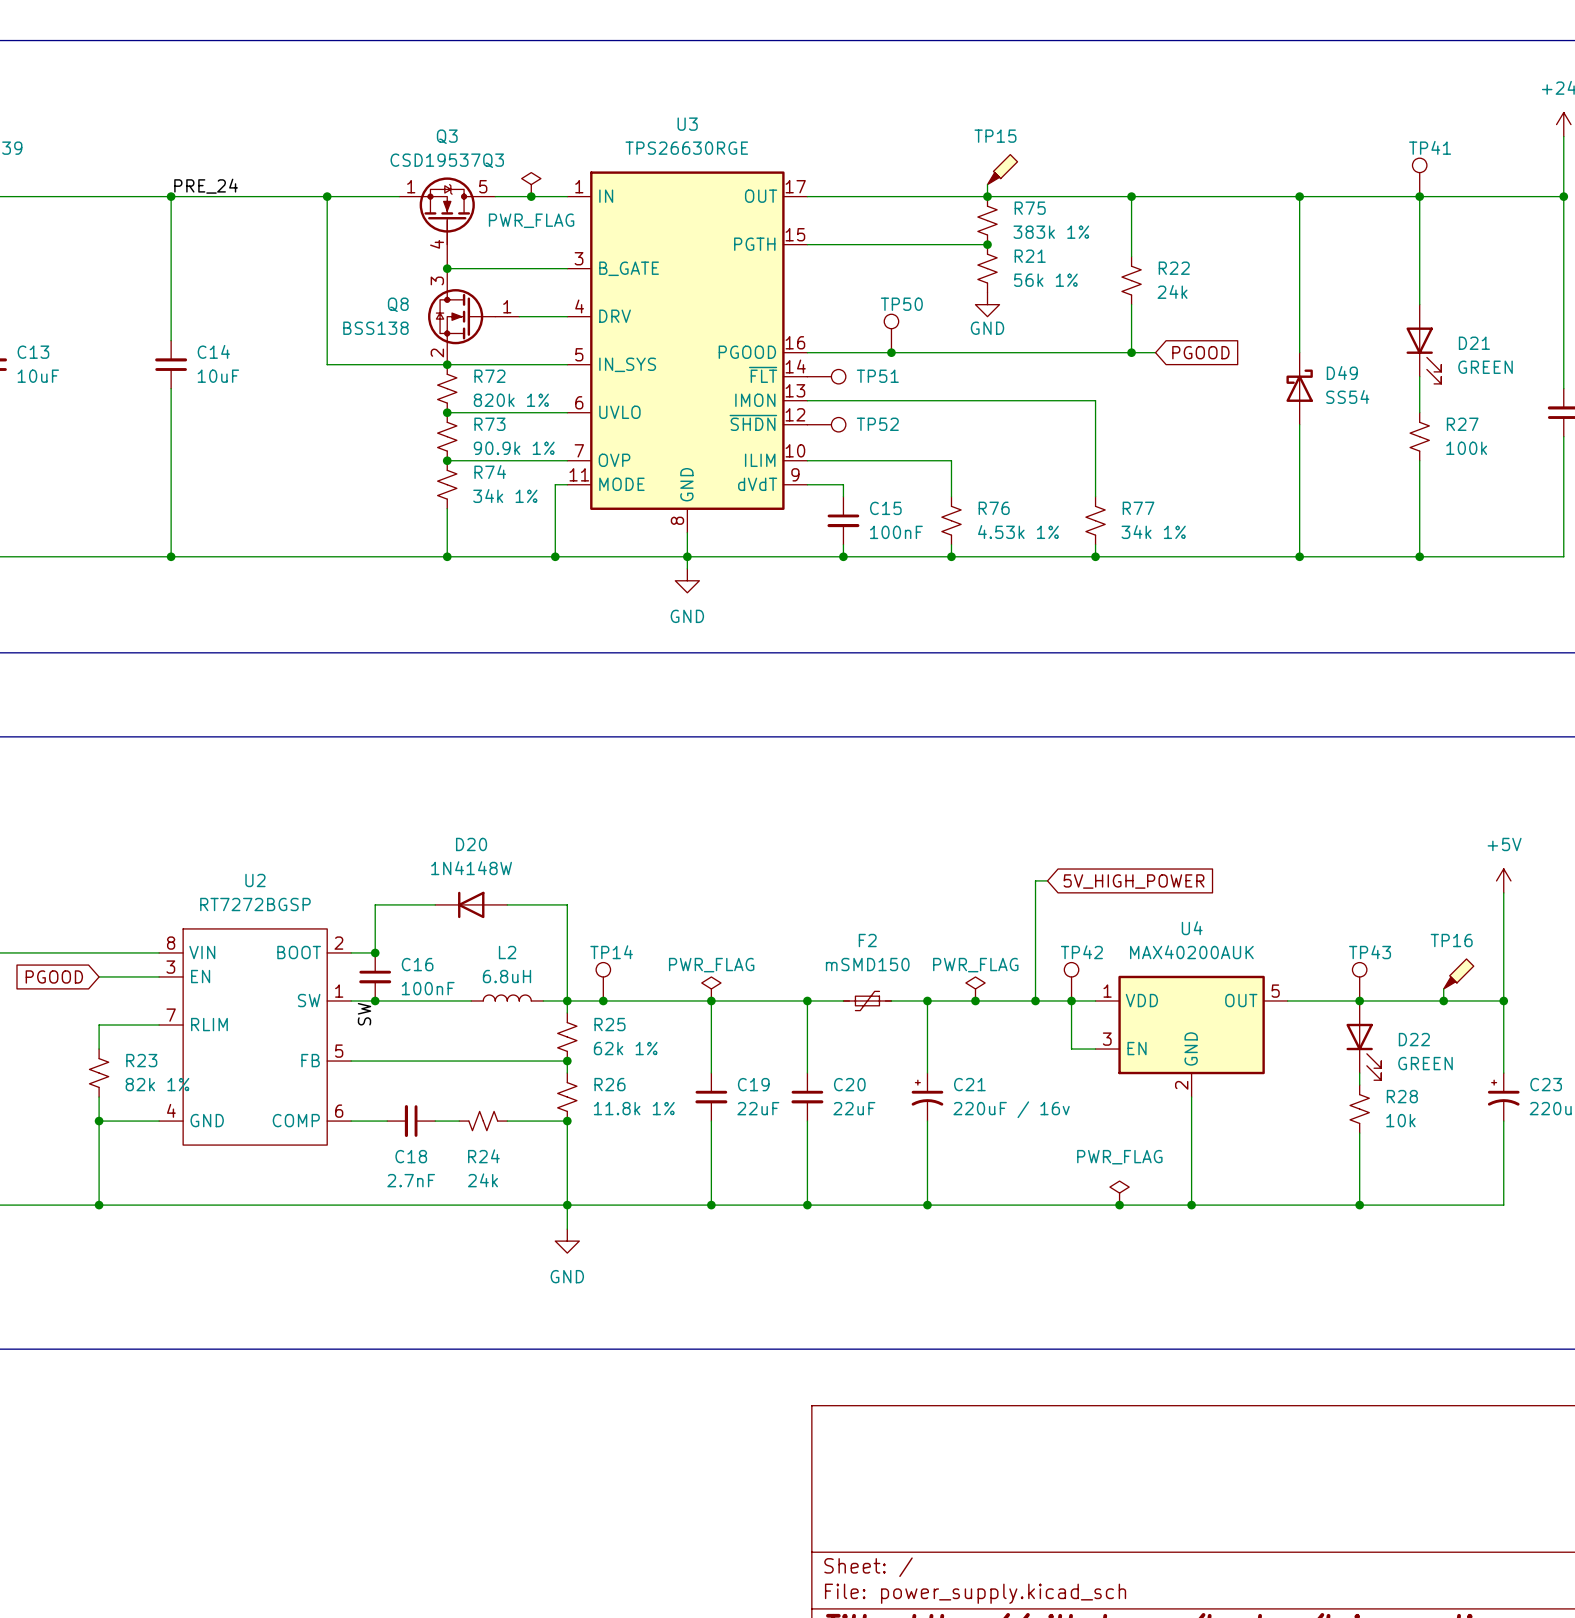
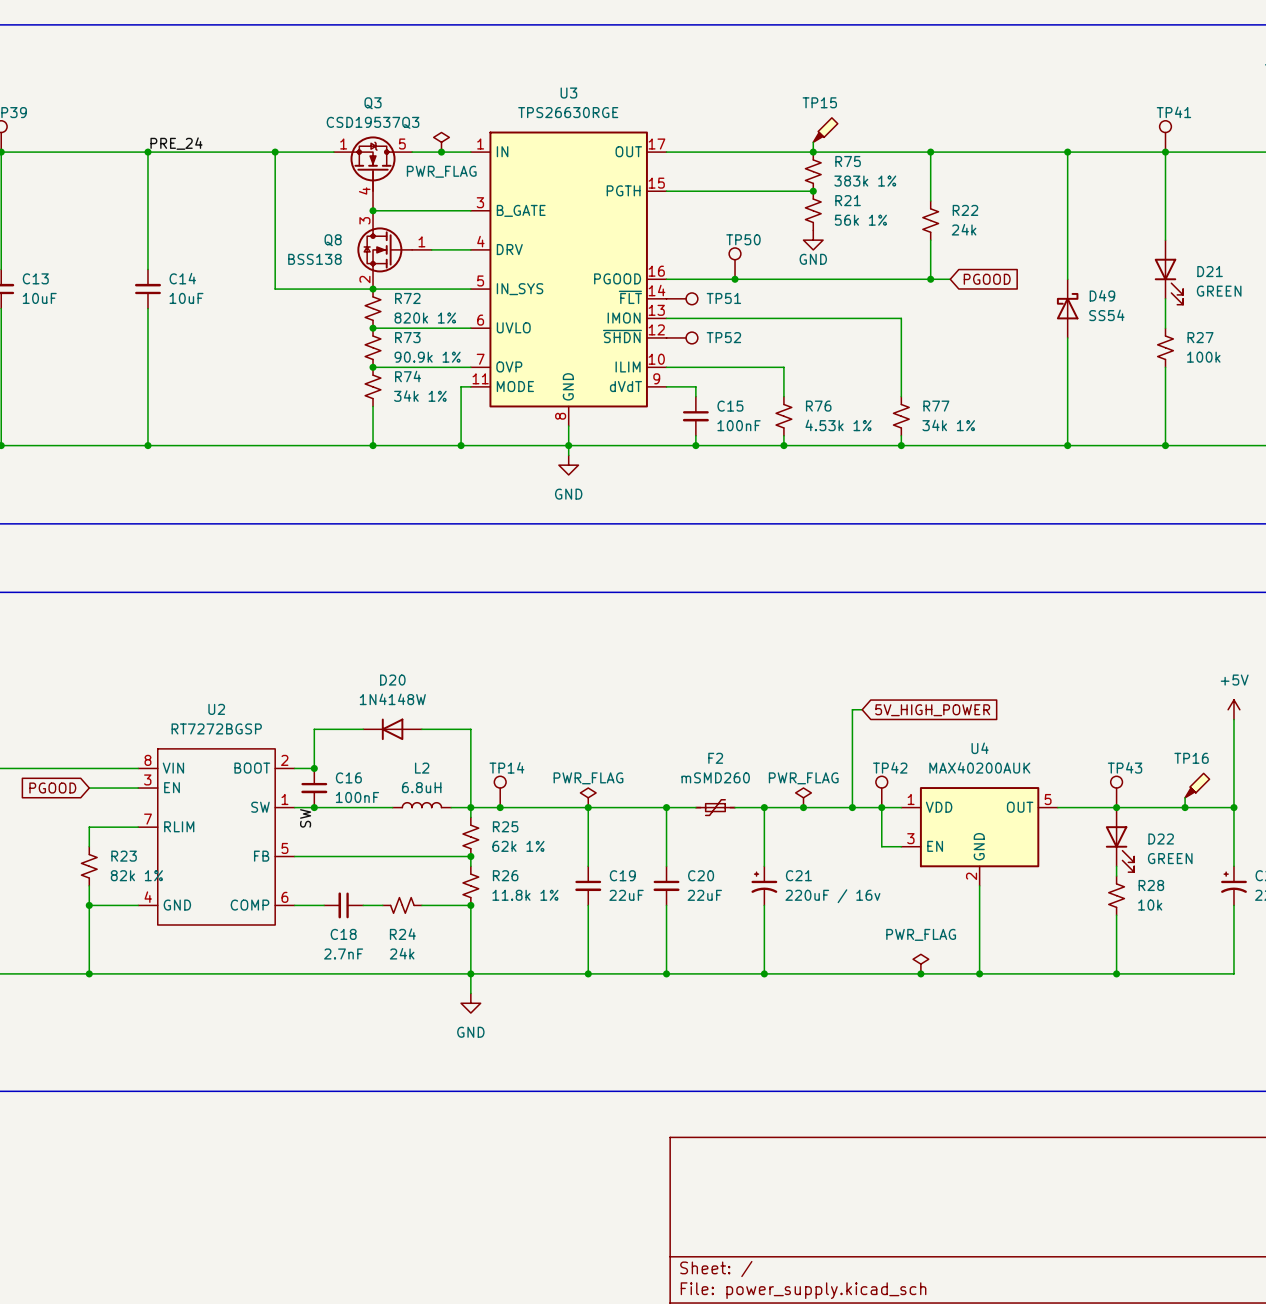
F2 value: mSMD150 (867, 964) -> mSMD260 (715, 777)

